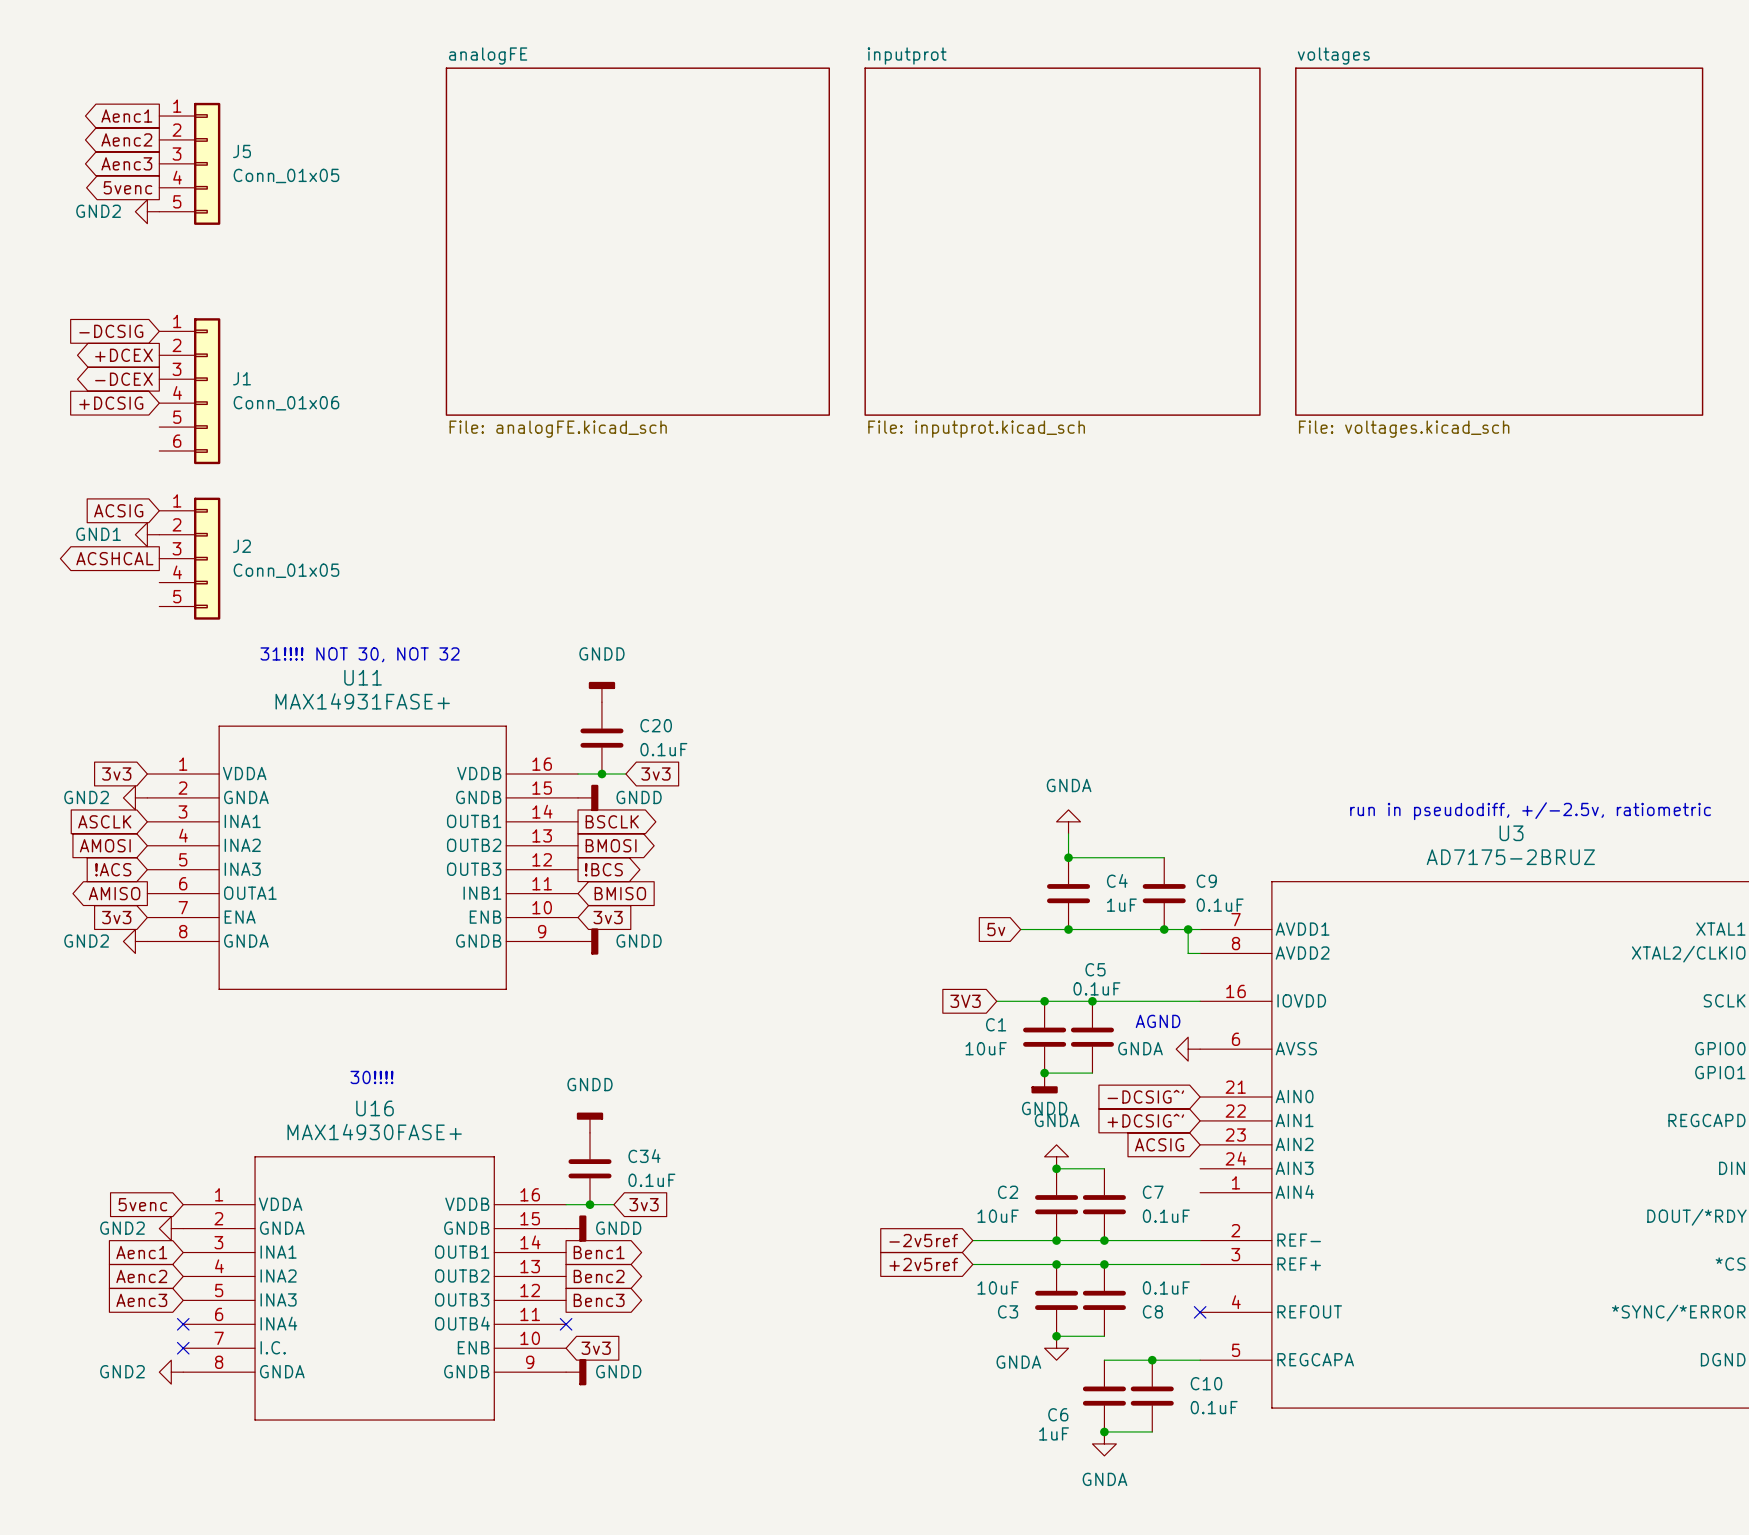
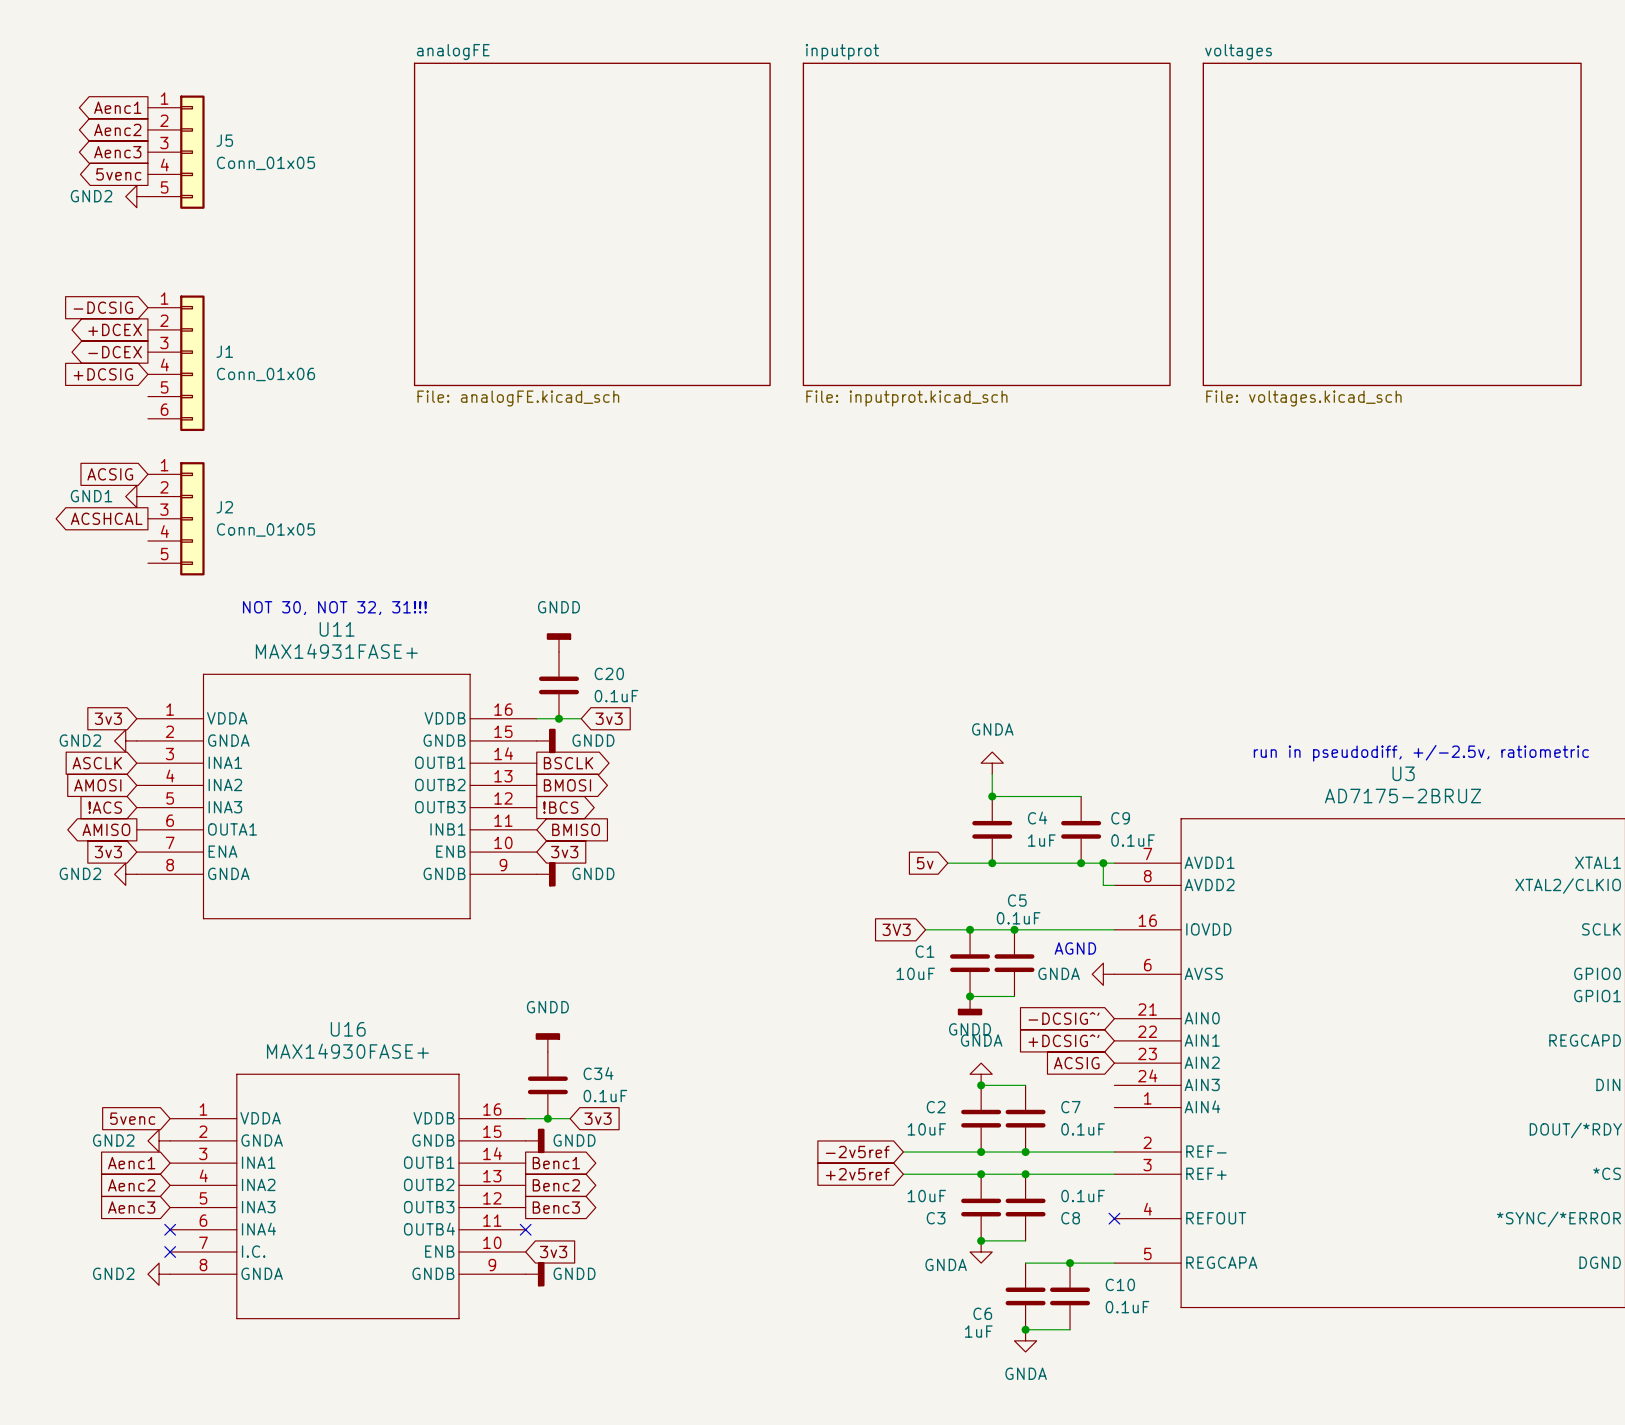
text: 31!!!! NOT 30, NOT 32 (360, 654) -> NOT 30, NOT 32, 31!!! (334, 608)
text: 30!!!! (371, 1077) -> none

